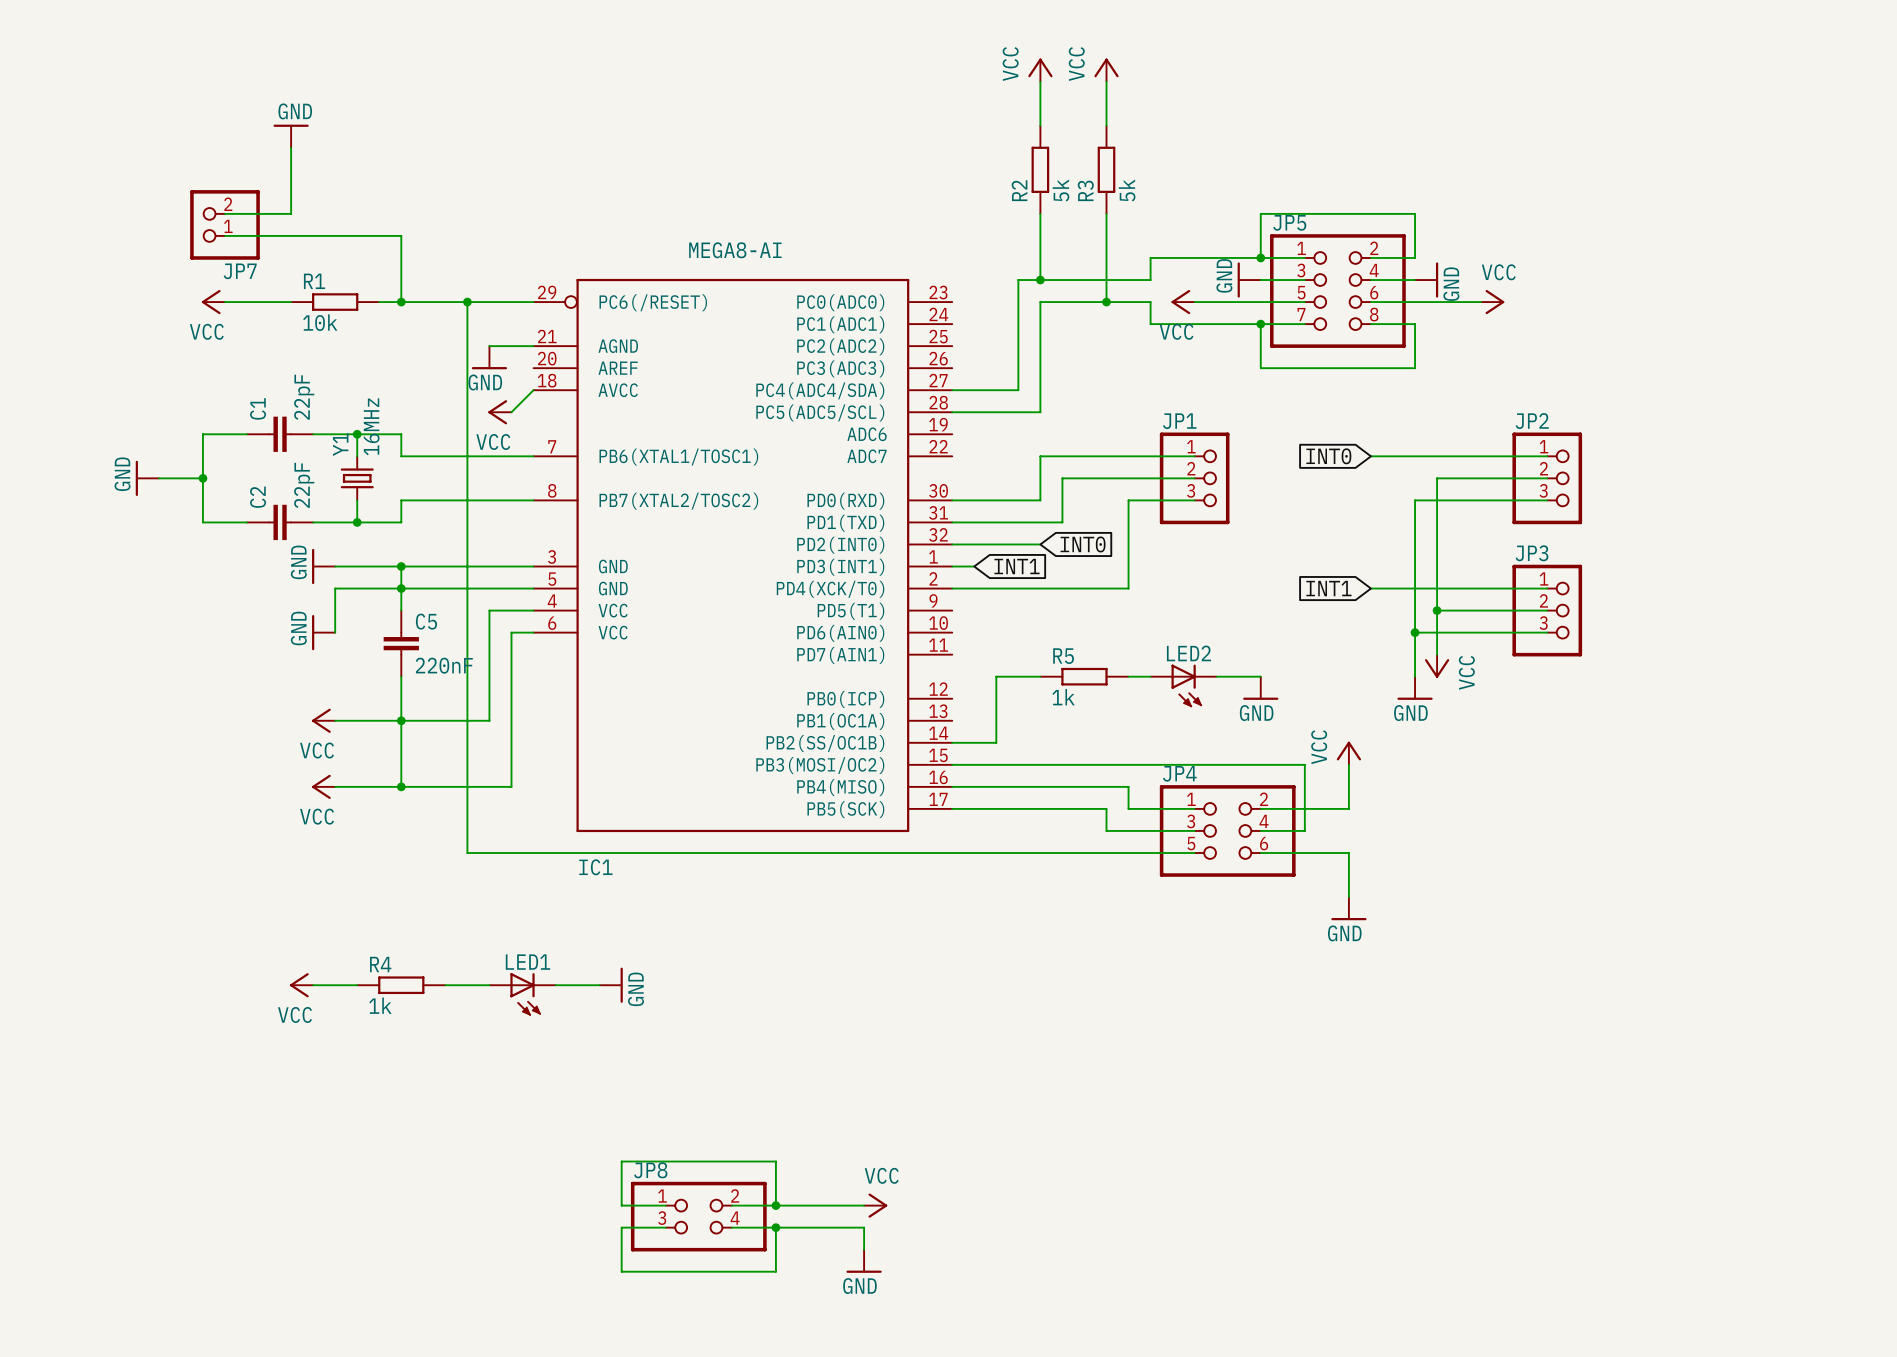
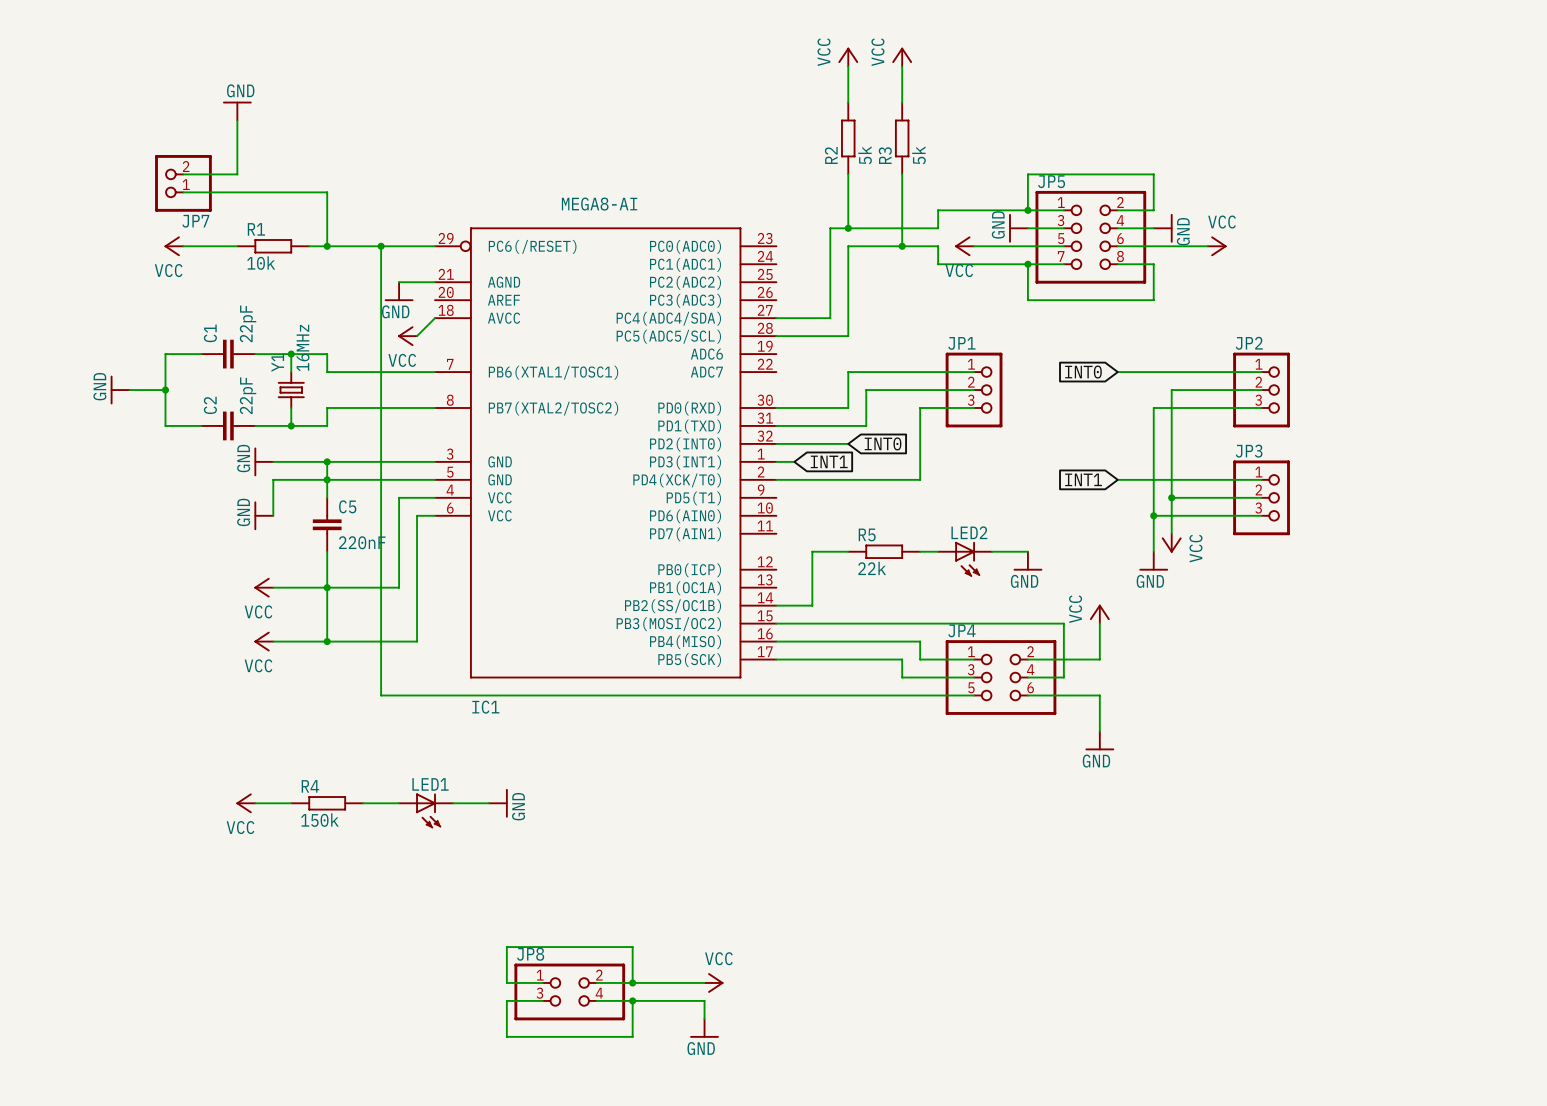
R5 value: 1k (1063, 697) -> 22k (872, 568)
R4 value: 1k (380, 1005) -> 150k (319, 820)

